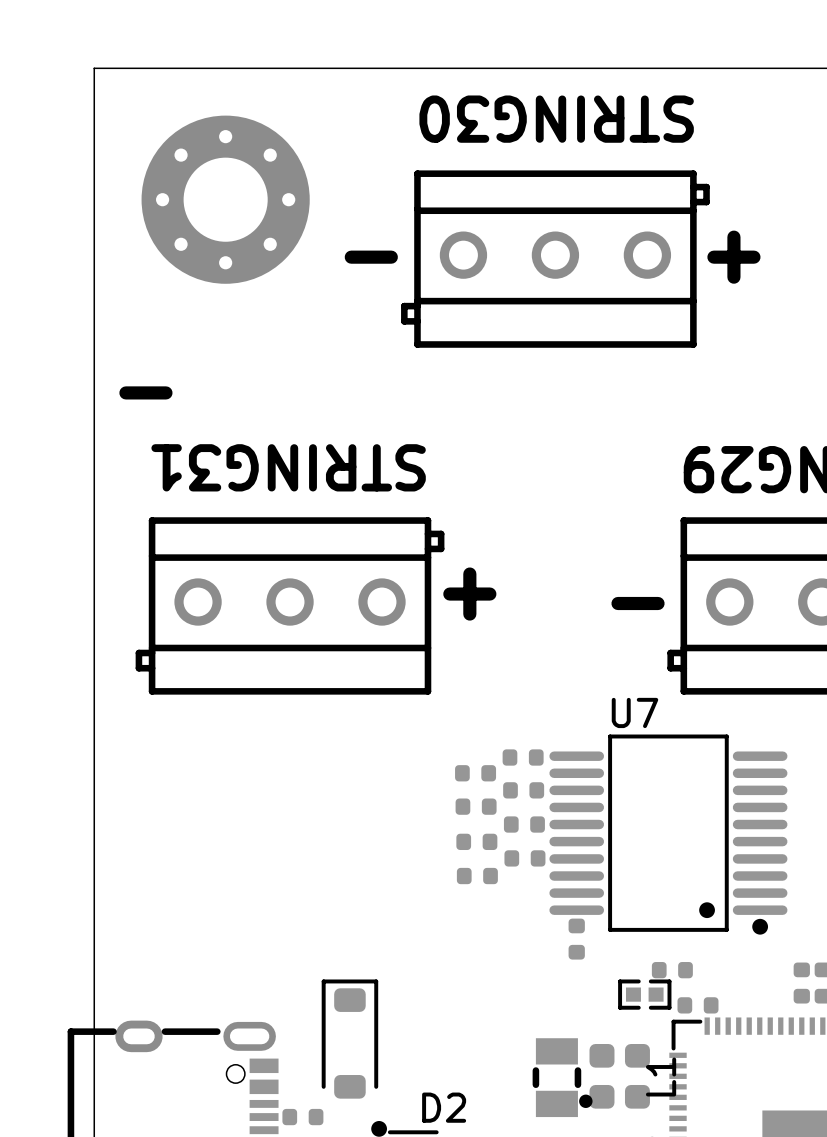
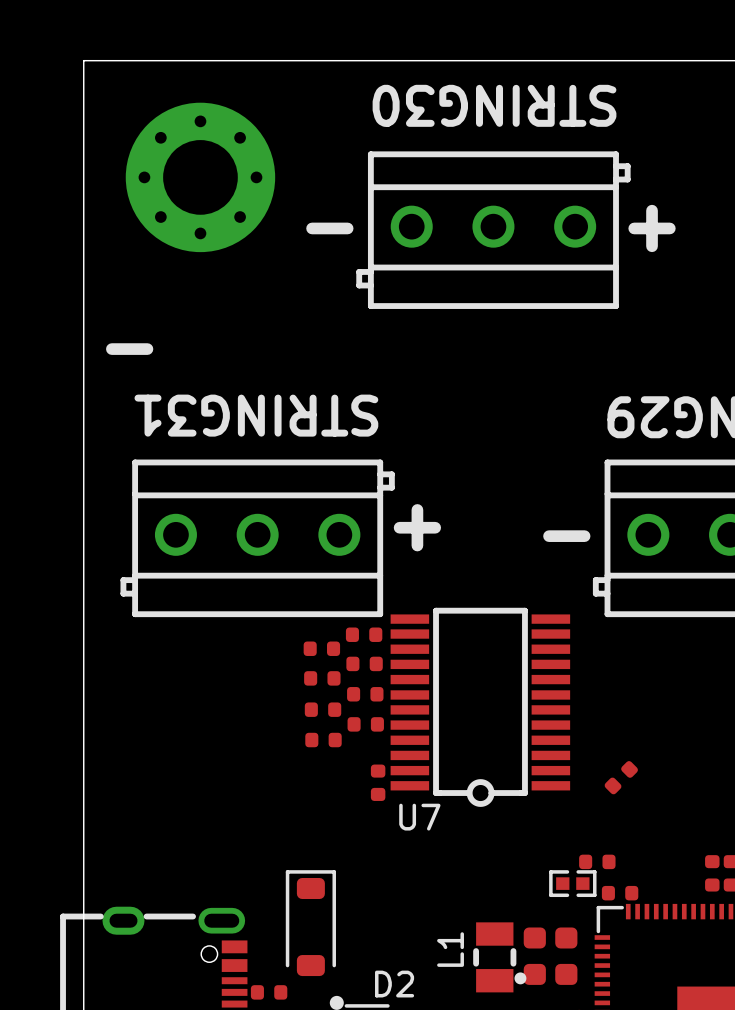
U7 name position: U7 (634, 712) -> U7 (419, 817)
part: none -> (364, 634)
part: none -> (321, 648)
U7 footprint: [549, 734, 788, 935] -> [390, 607, 571, 807]
part: none -> (364, 663)
part: (523, 757) -> none
part: none -> (322, 678)
part: (475, 773) -> none
part: none -> (365, 694)
part: (523, 790) -> none
part: none -> (323, 709)
part: (476, 806) -> none
part: none -> (365, 724)
part: (524, 824) -> none
part: none -> (323, 740)
part: (476, 841) -> none
part: (524, 858) -> none
part: none -> (621, 777)
part: (477, 876) -> none
part: none -> (378, 782)
part: (576, 939) -> none
L1 name position: L1 (661, 1077) -> L1 (450, 949)

